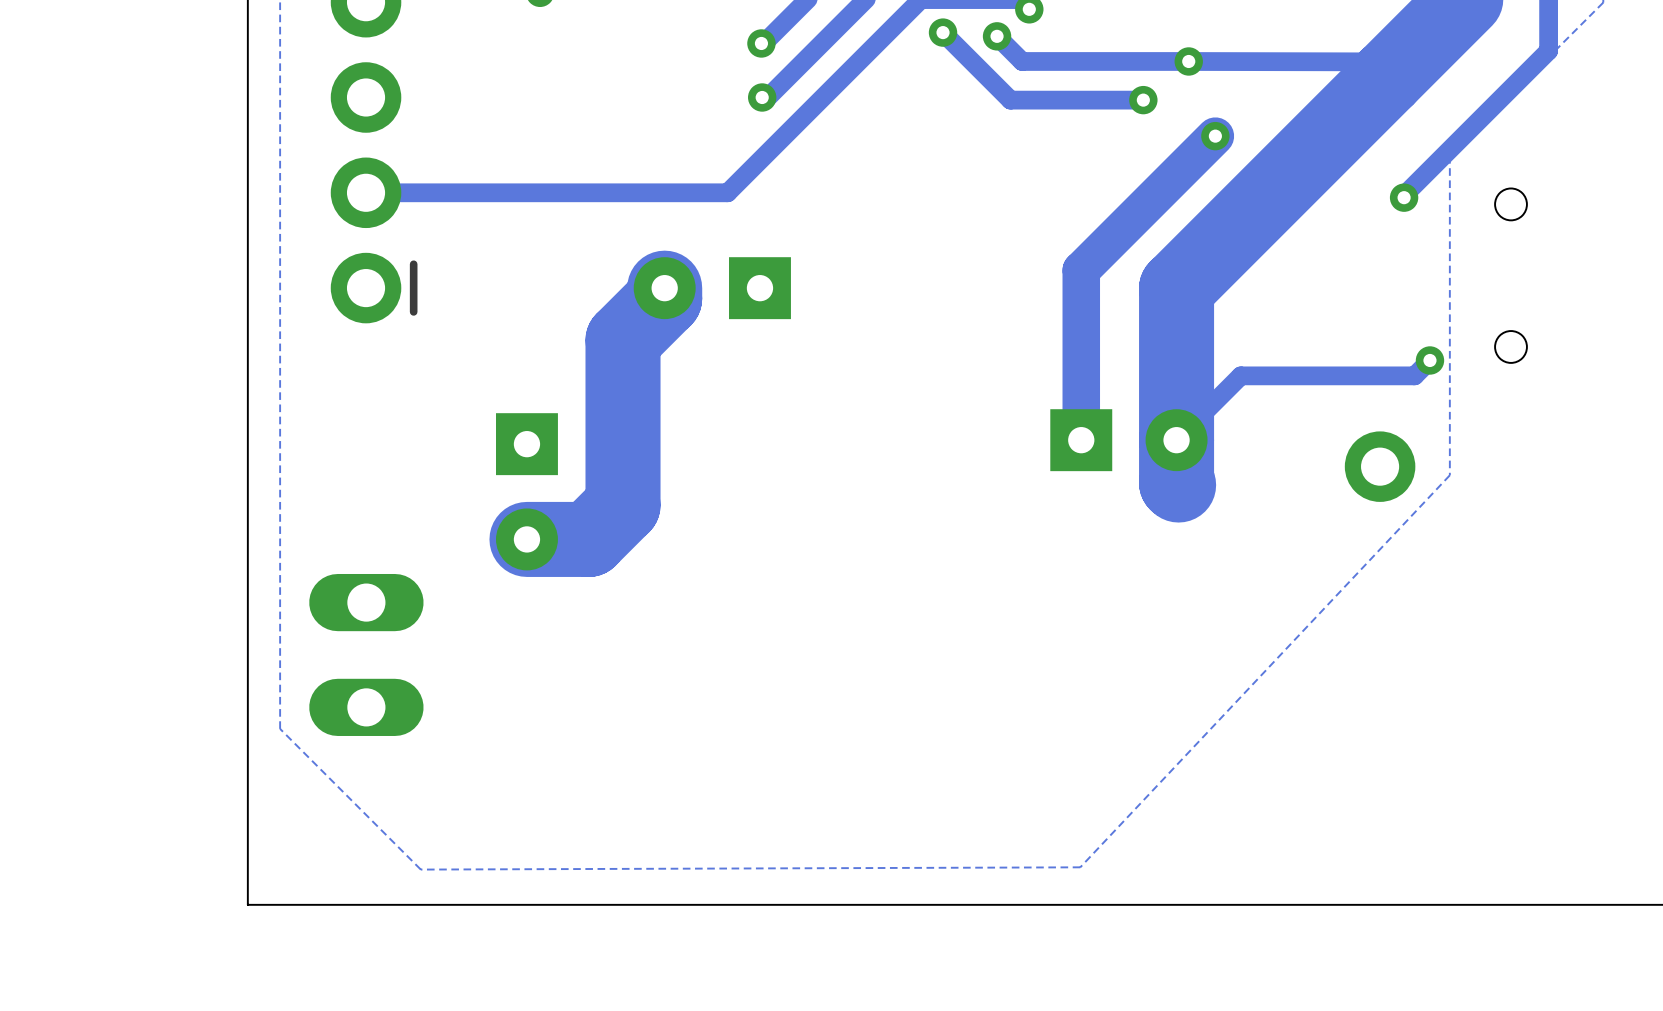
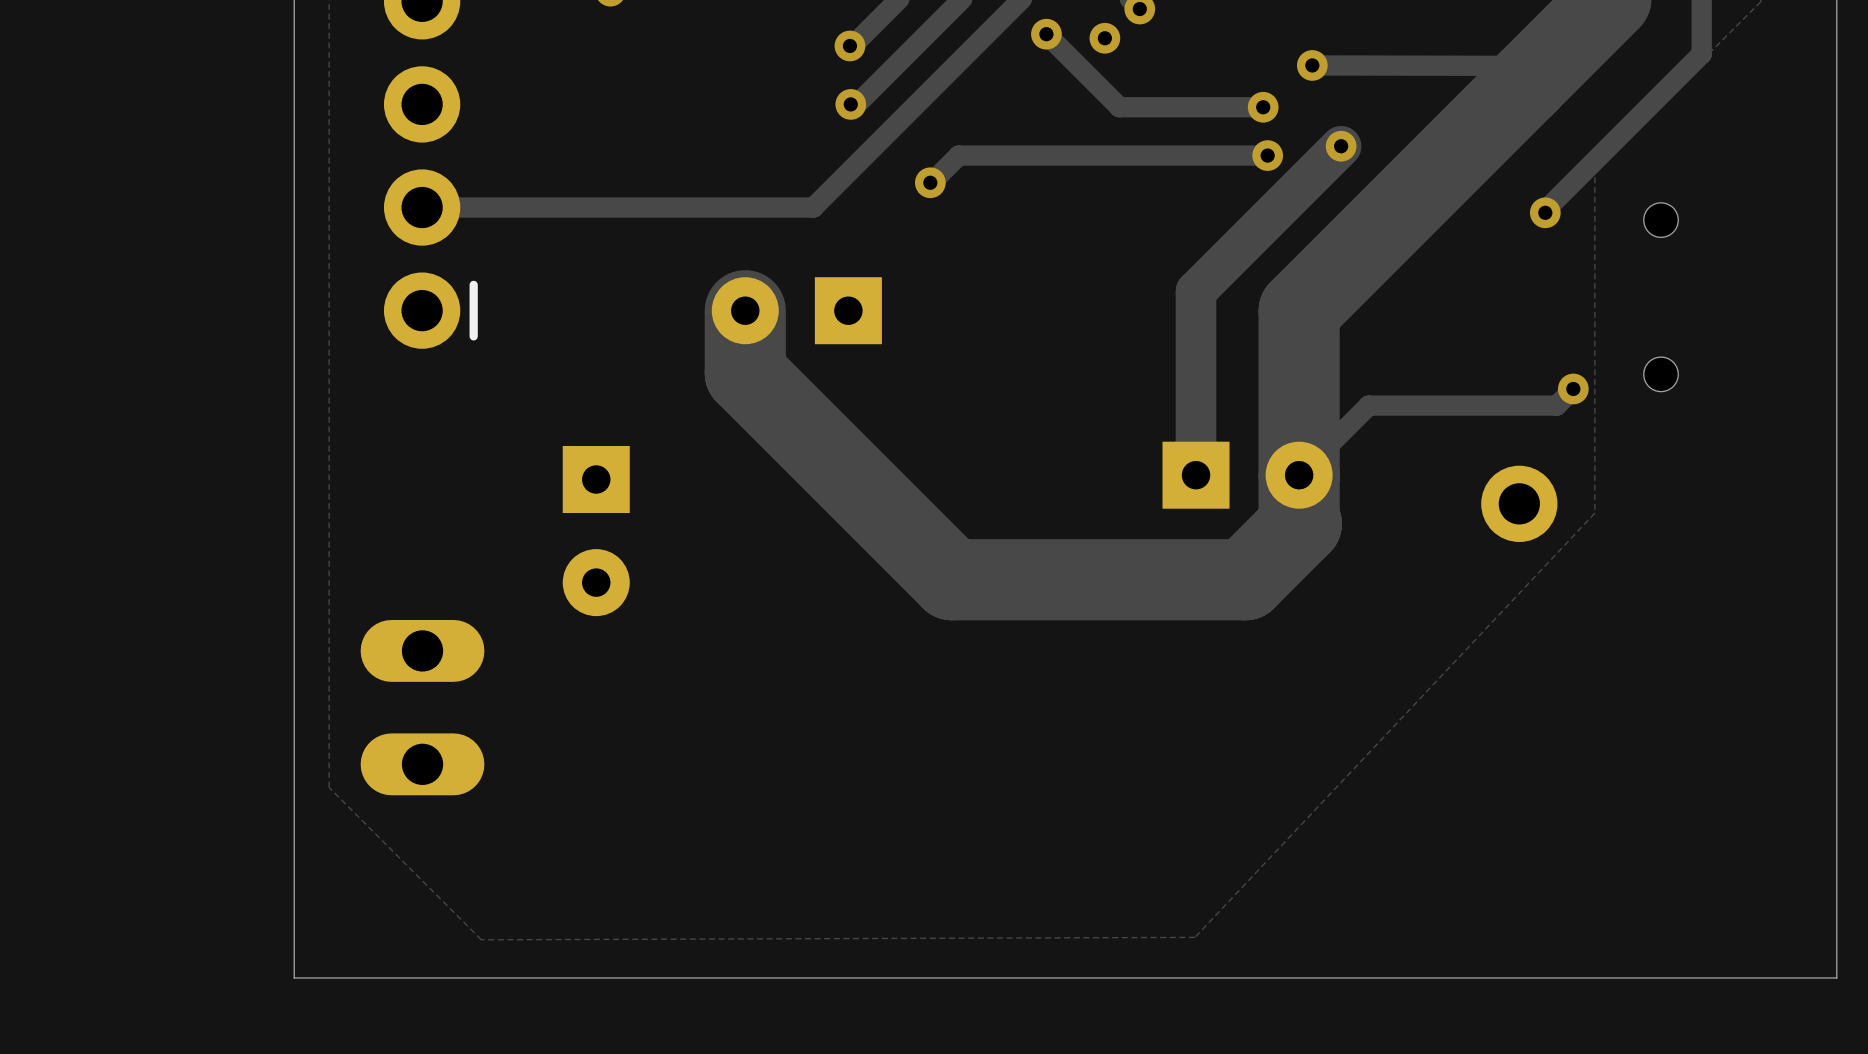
track: (997, 36) (1022, 61) (1188, 61) -> none
track: none -> (1267, 155) (958, 155) (928, 186)
via: none -> (1267, 155)
via: none -> (930, 182)
track: (664, 298) (623, 340) (623, 505) (588, 539) (526, 539) -> (745, 321) (745, 373) (951, 579) (1245, 579) (1301, 523)

